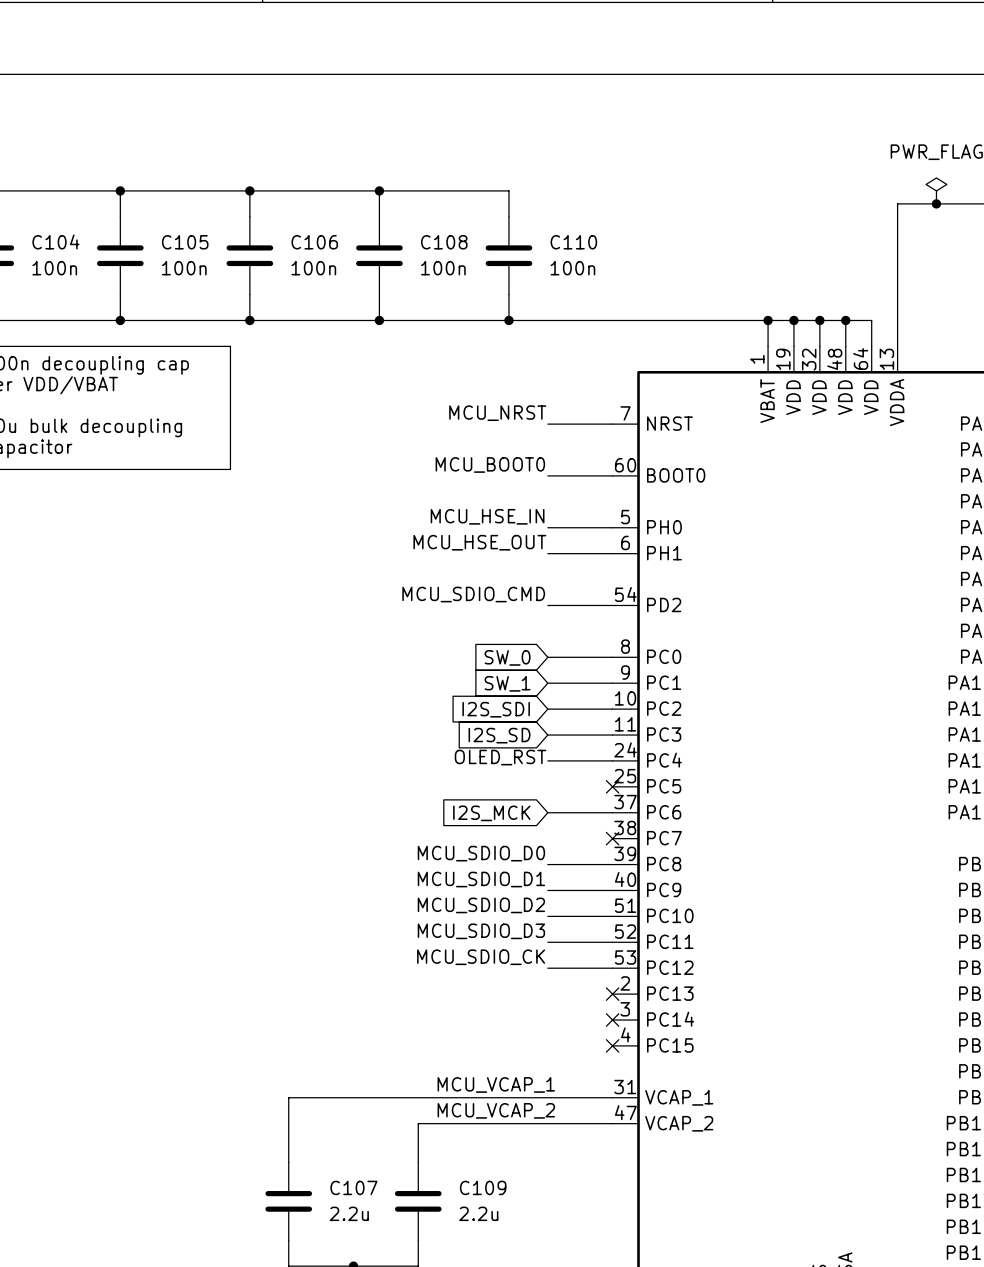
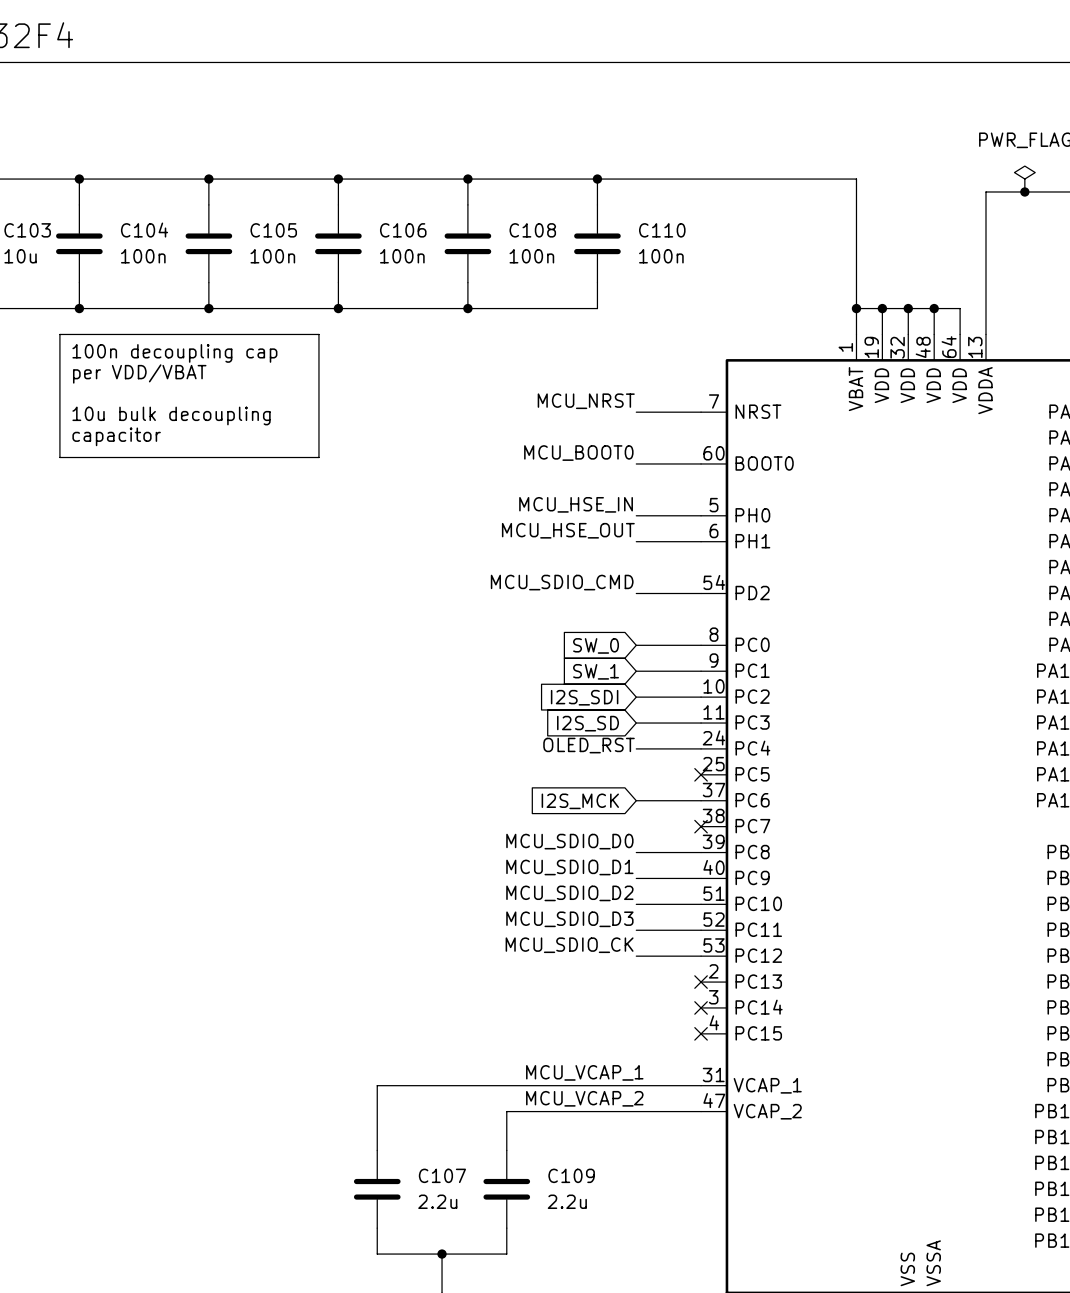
junction: none -> (597, 179)
wire: (508, 320) (768, 320) -> (597, 179) (856, 179) (856, 308)
junction: (508, 320) -> none

